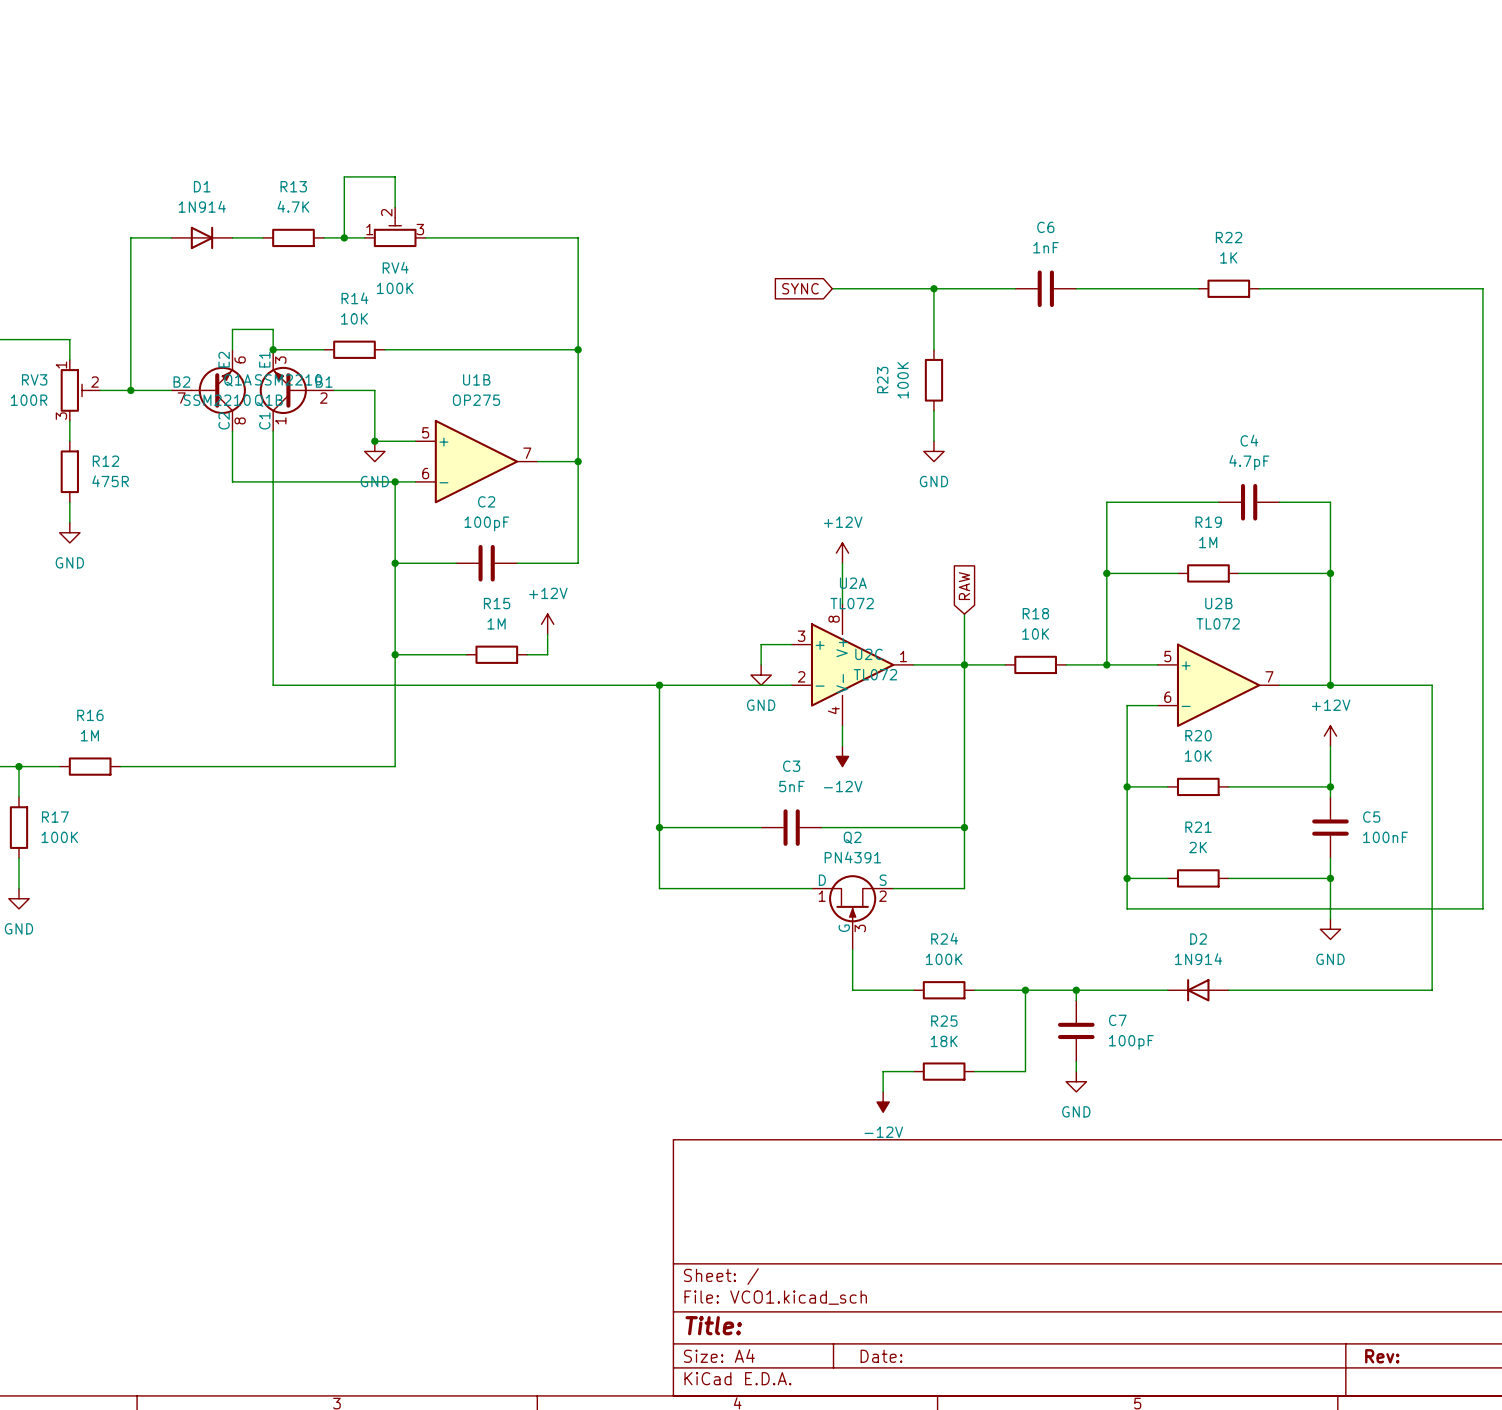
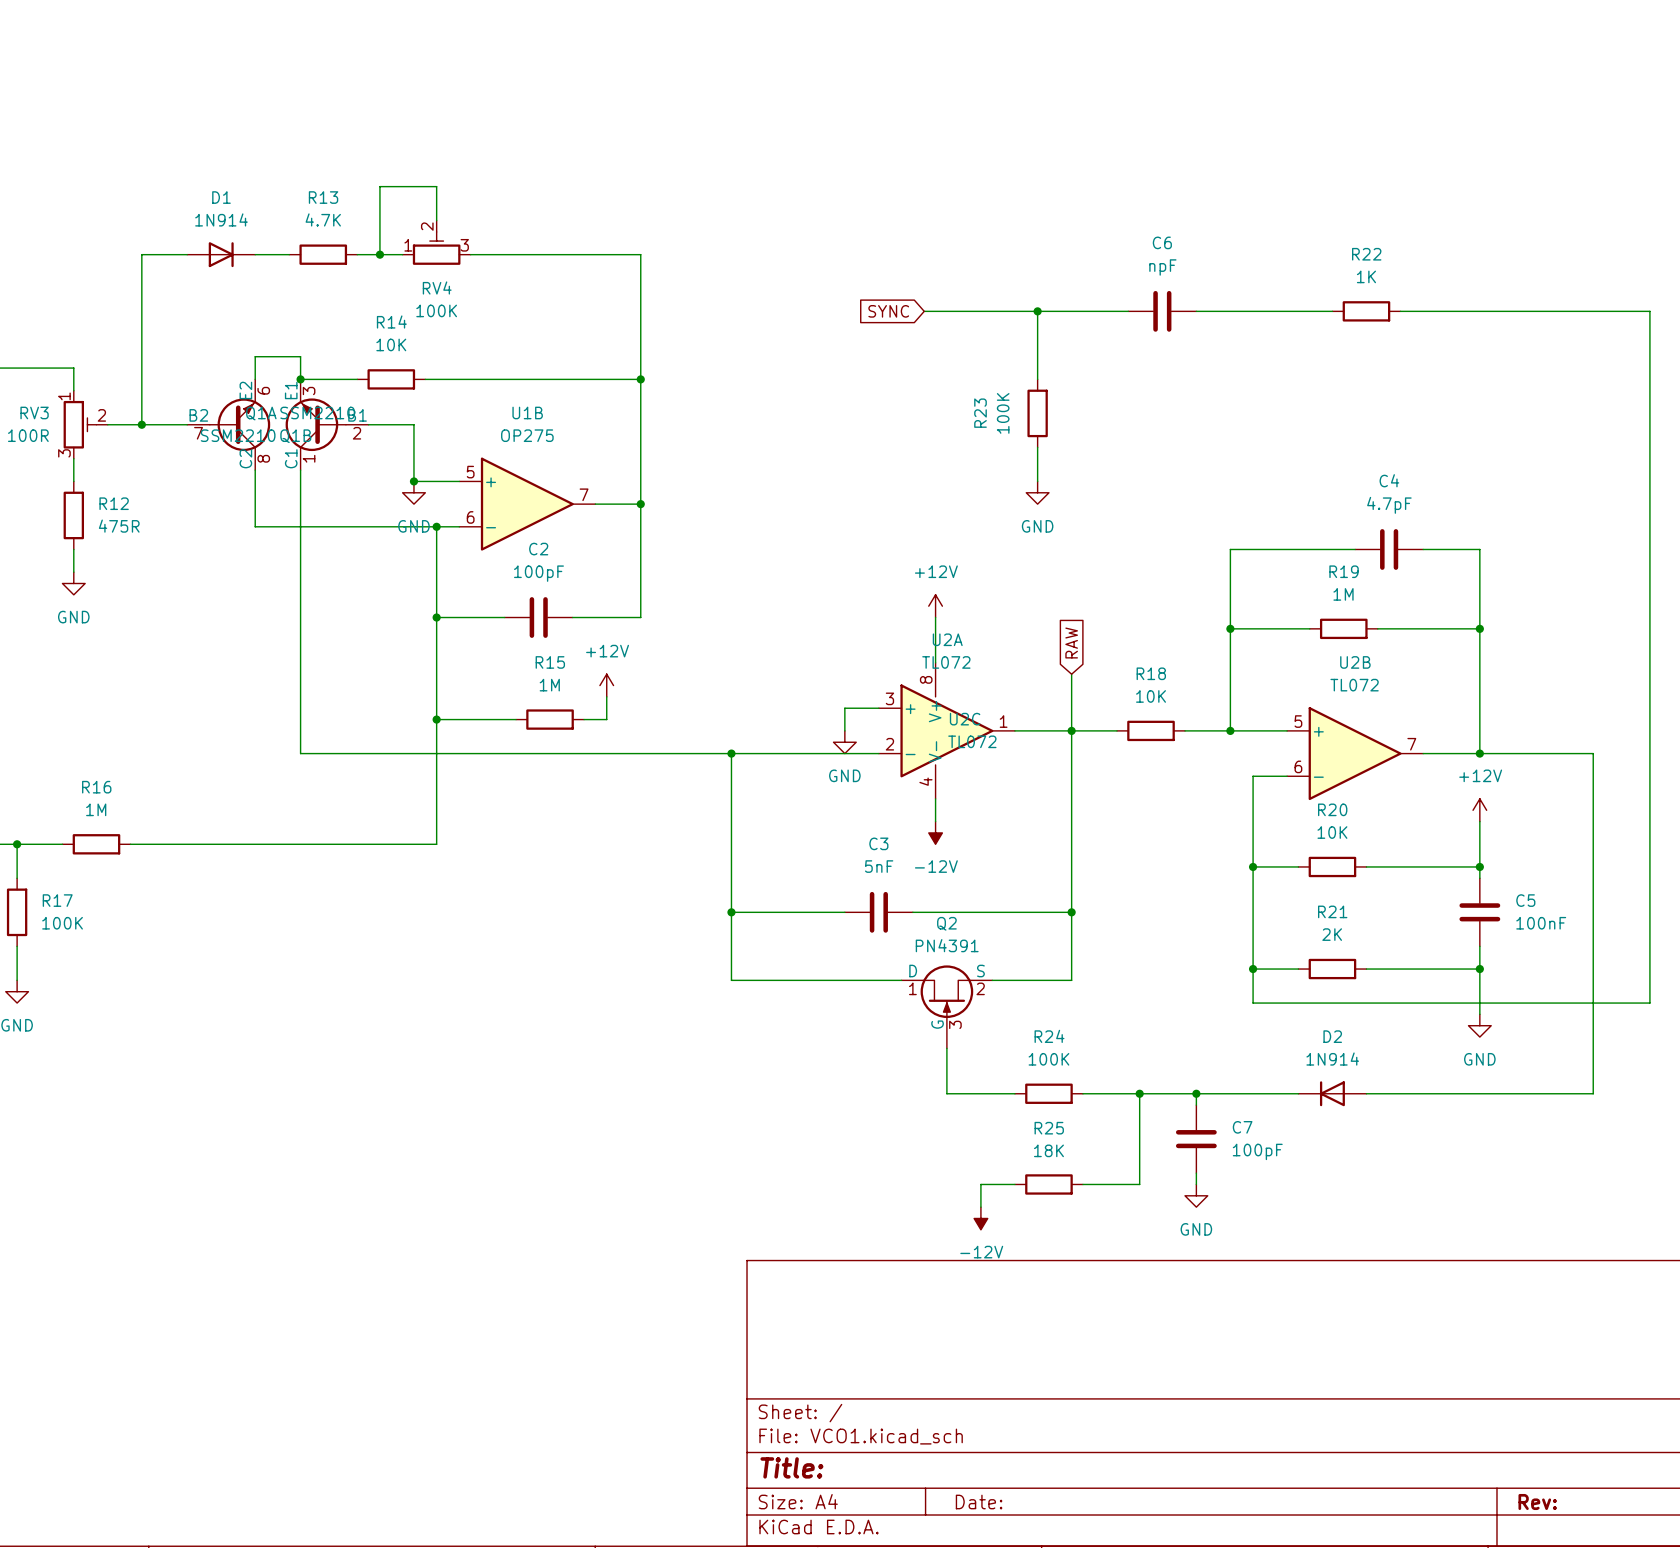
C6 value: 1nF (1046, 247) -> npF (1162, 267)

